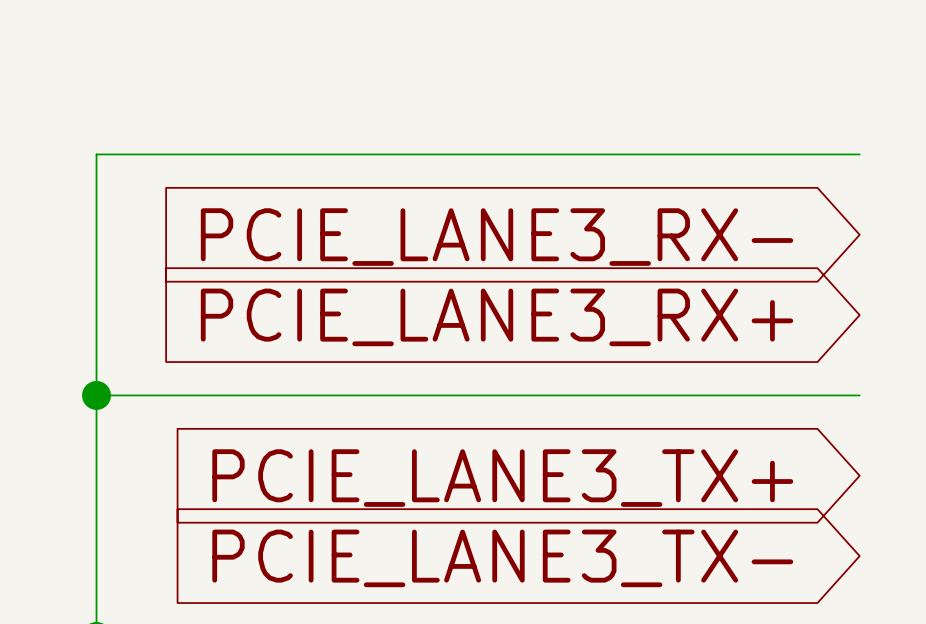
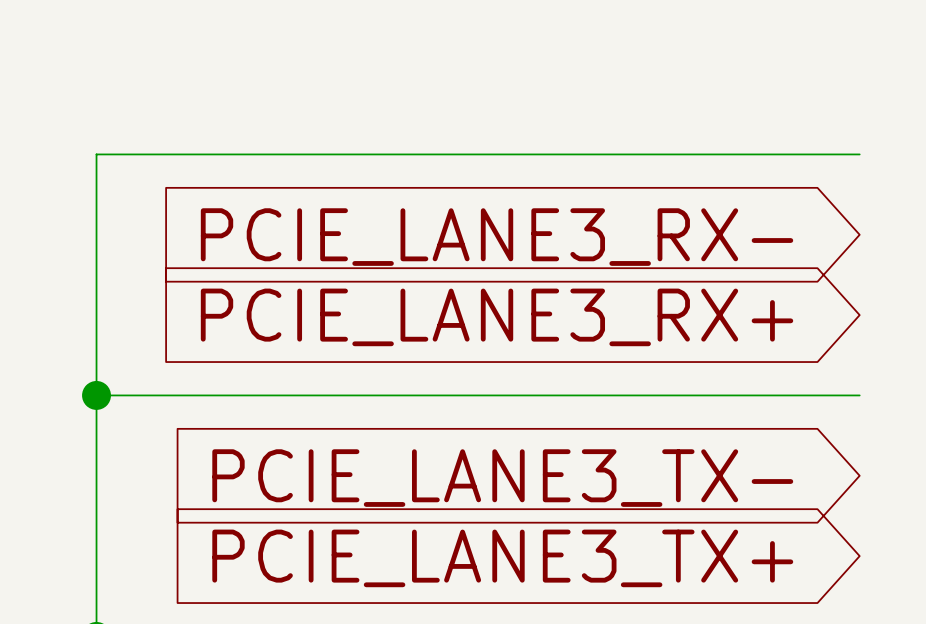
global label: PCIE_LANE3_TX+ (502, 478) -> PCIE_LANE3_TX- (502, 478)
global label: PCIE_LANE3_TX- (502, 558) -> PCIE_LANE3_TX+ (502, 558)

